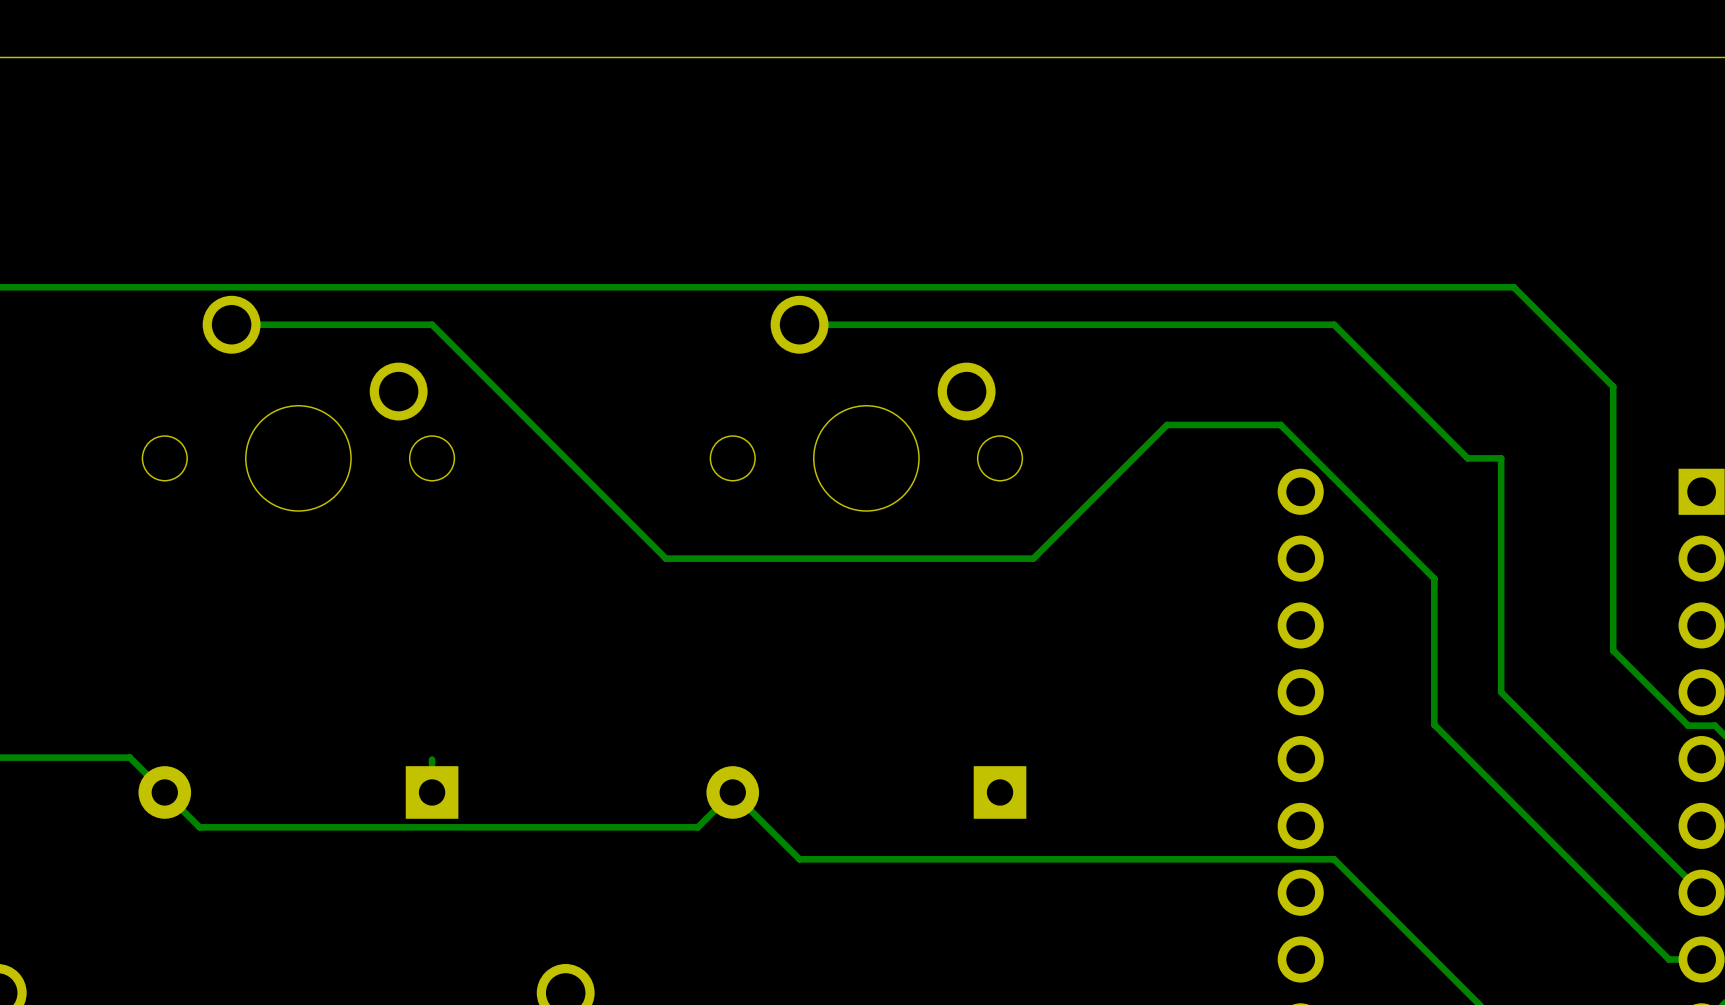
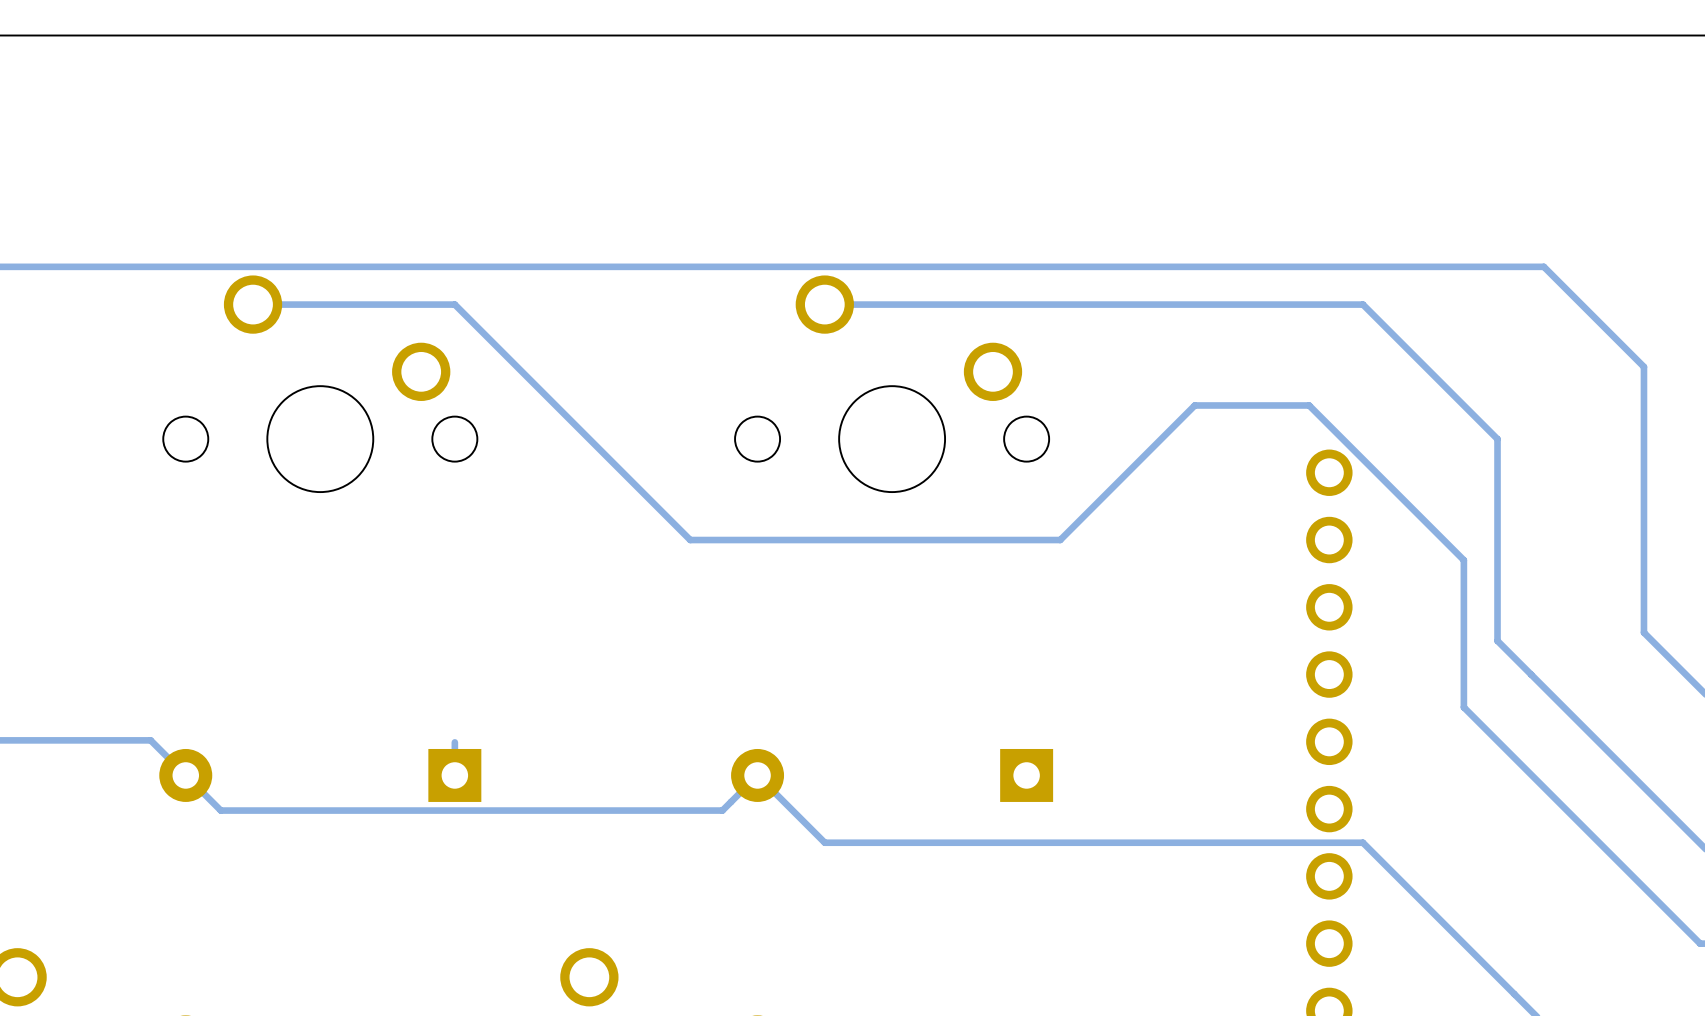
track: (1467, 458) (1501, 458) (1501, 692) -> (1497, 439) (1497, 640) (1531, 674)

